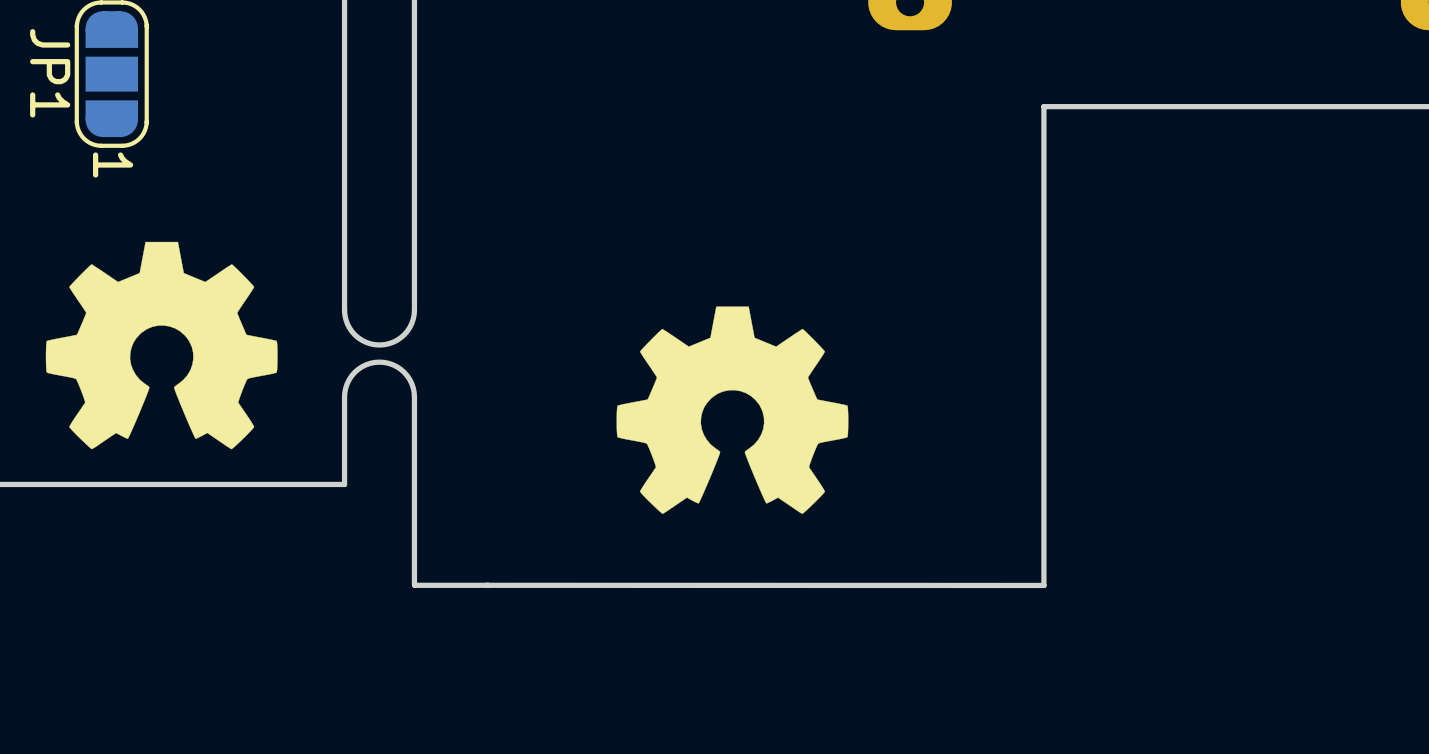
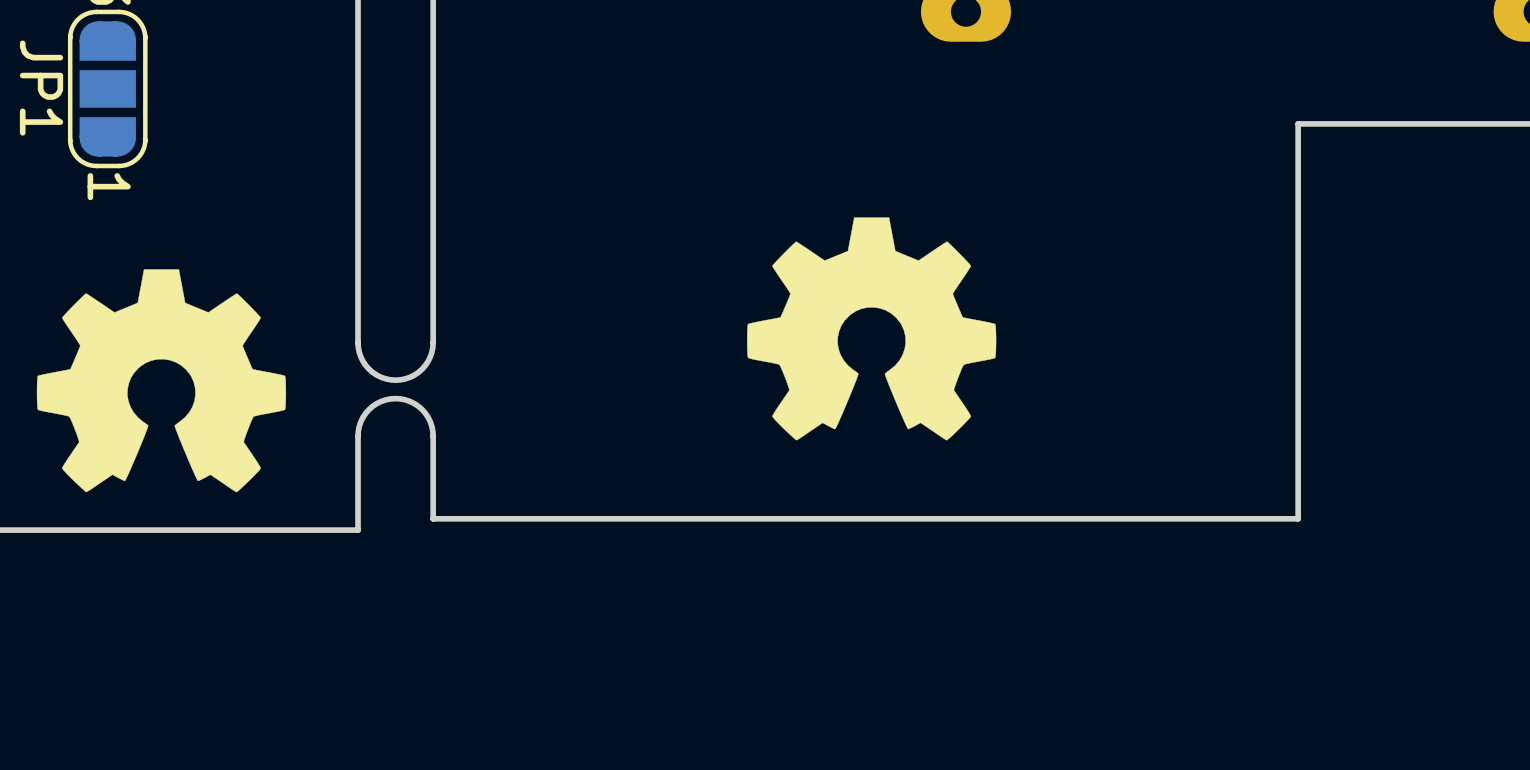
board edge: (1219, 106) (1043, 106) (1043, 585) (486, 585) -> (1298, 123) (1298, 518) (433, 518) (433, 436)
board edge: (414, 397) (414, 585) -> none
drawing position: (732, 410) -> (871, 328)
board edge: (488, 585) (414, 585) -> none

